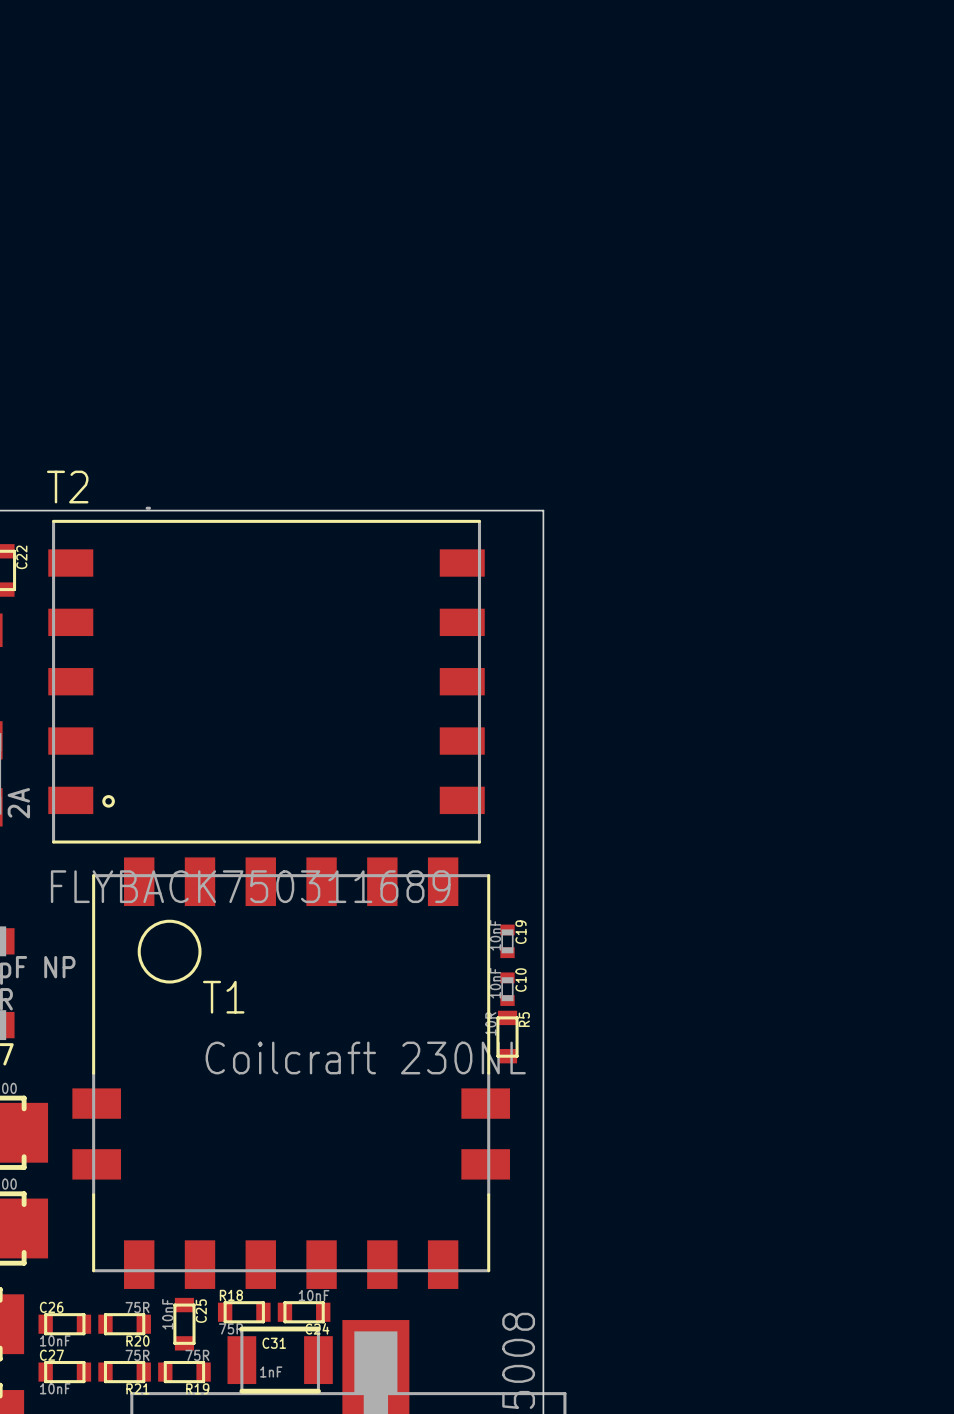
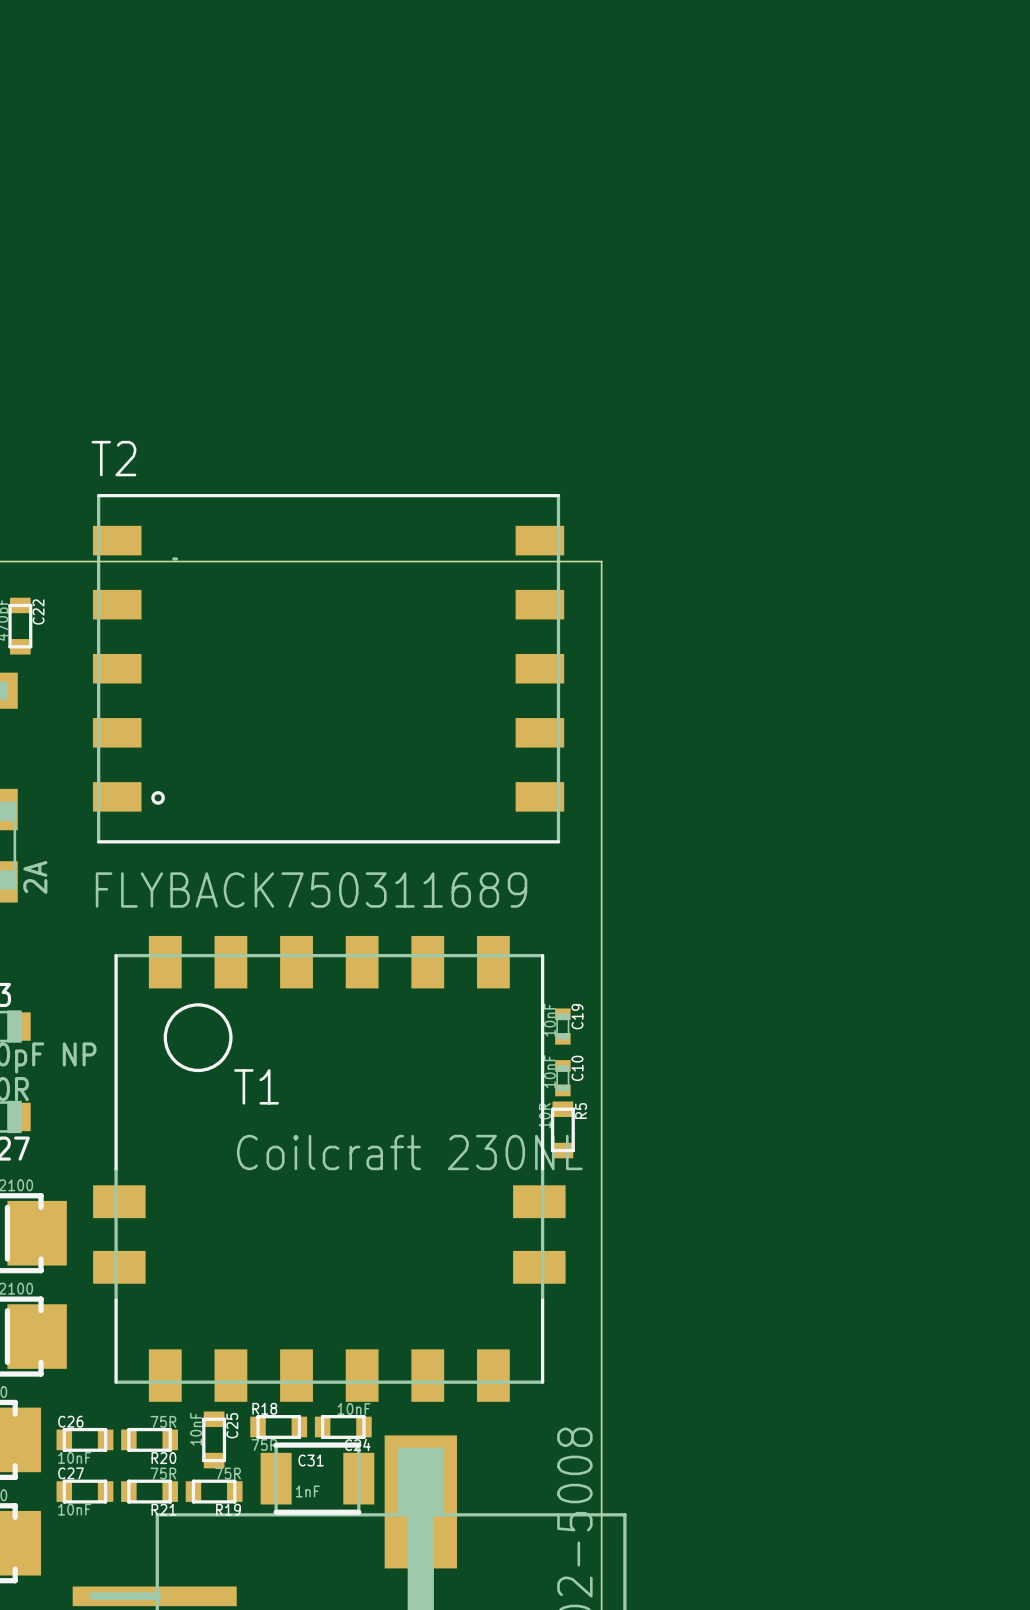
T2 position: (266, 681) -> (328, 668)

